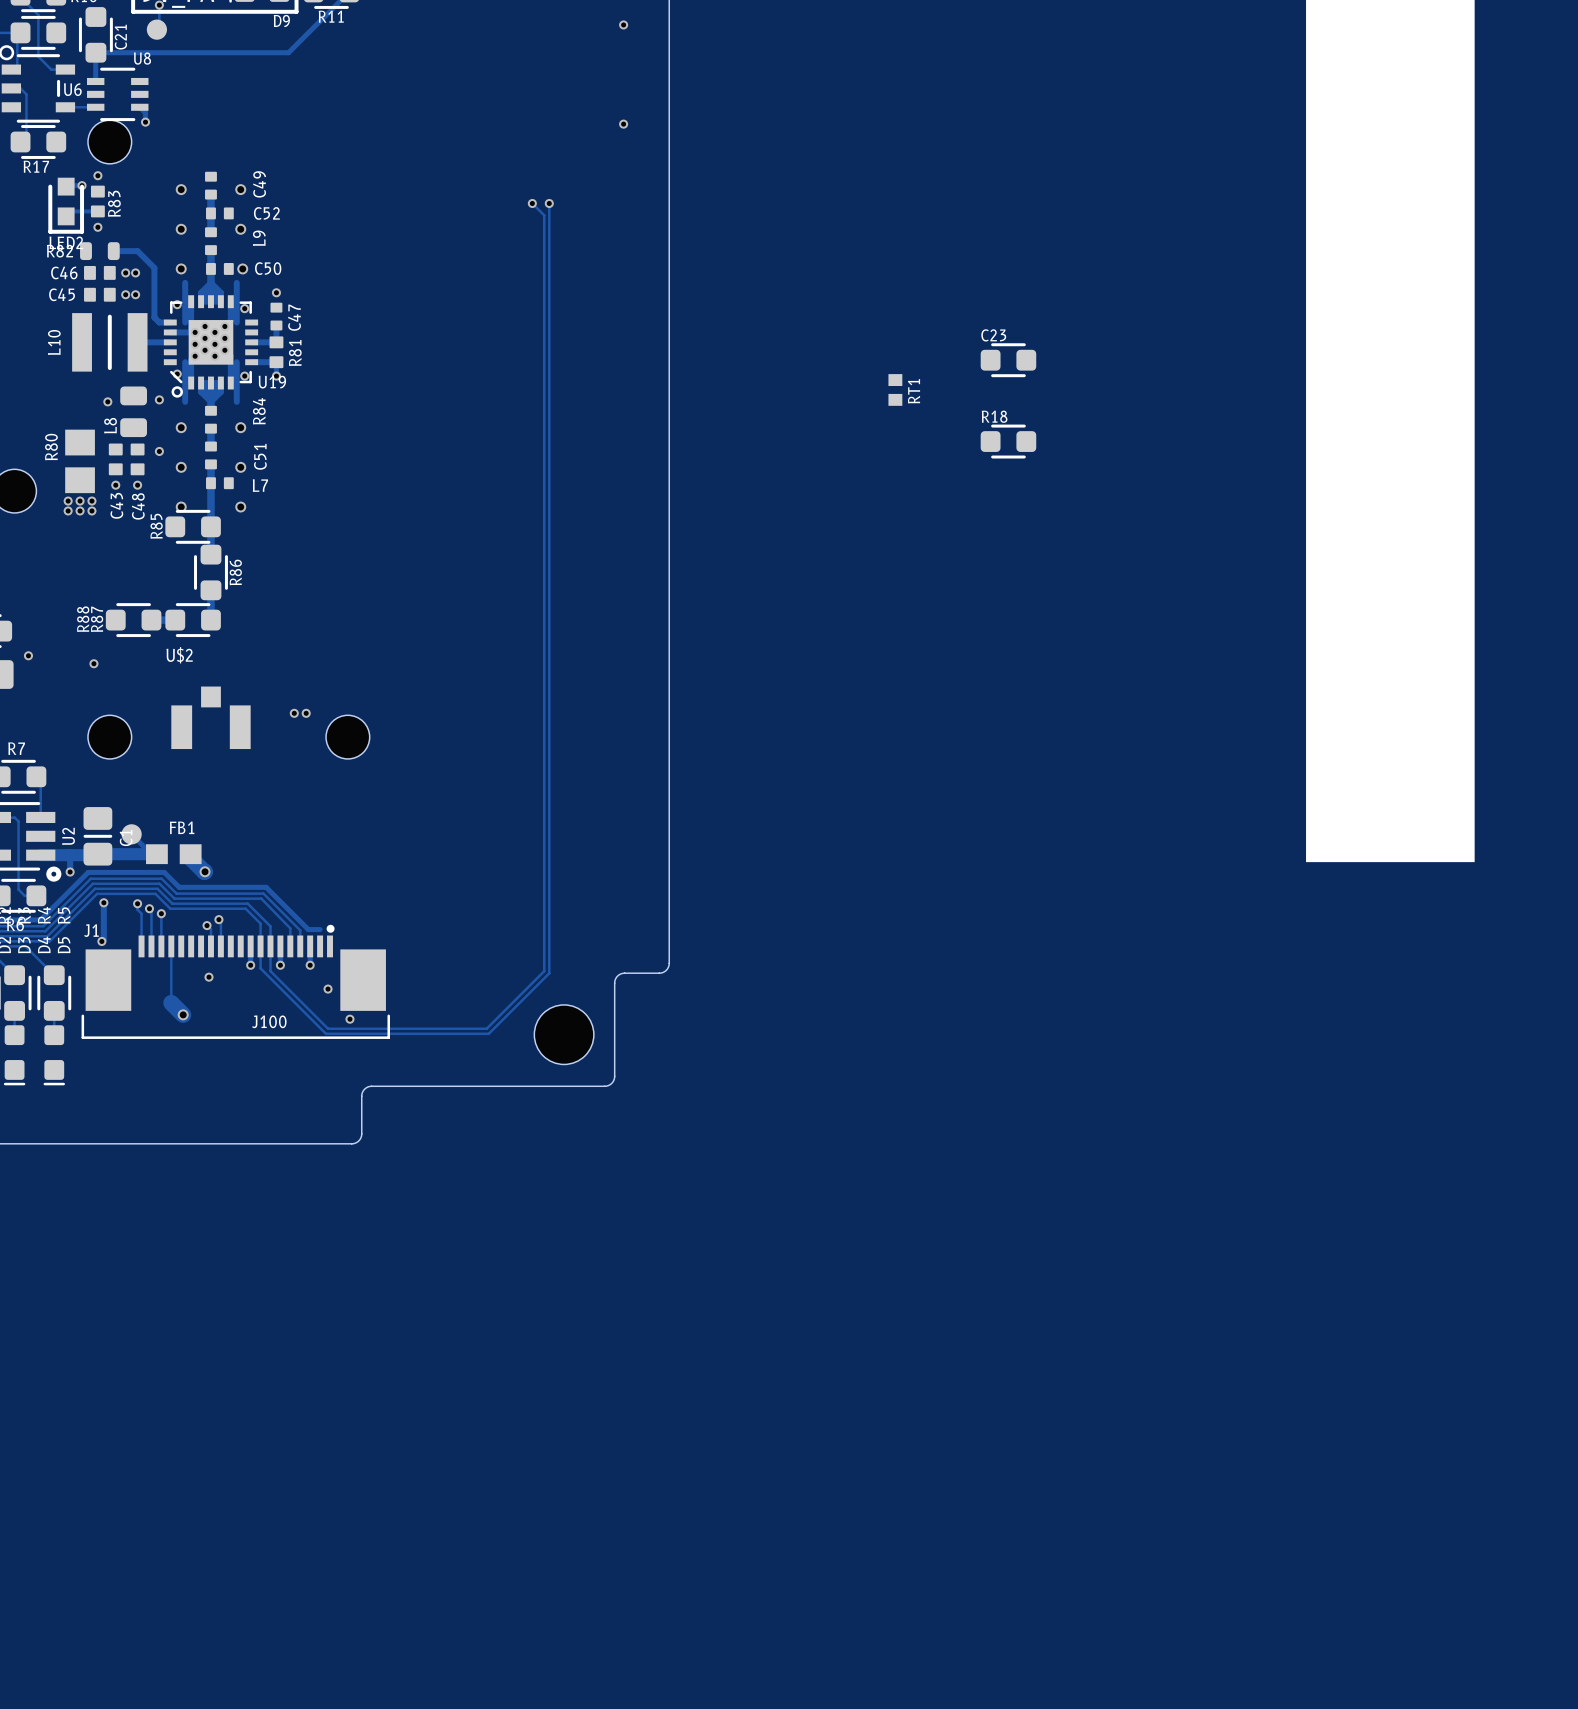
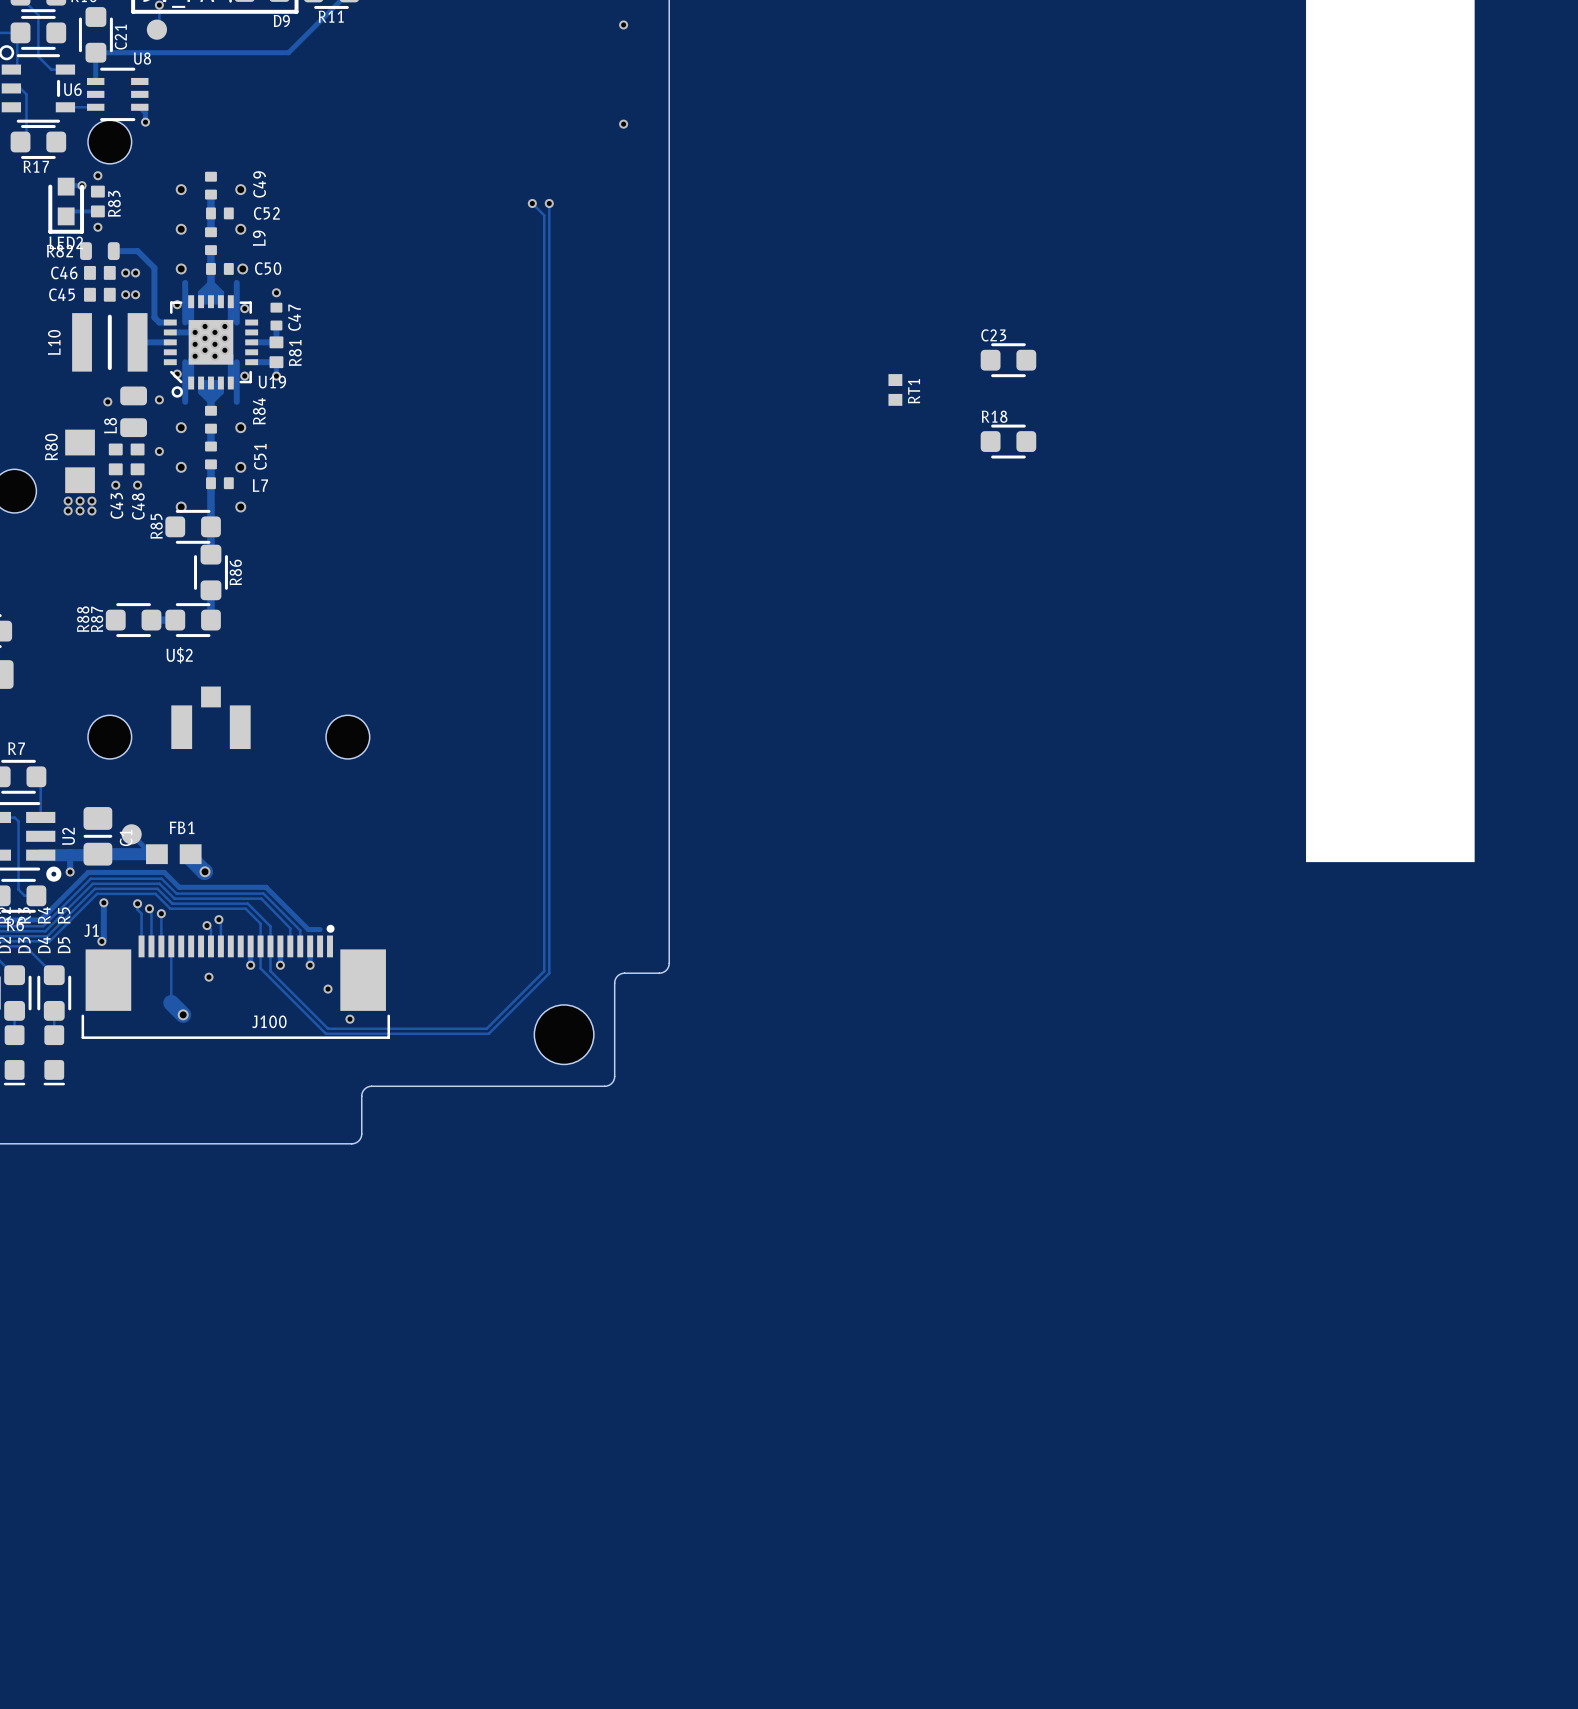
via: (28, 655) -> none
via: (93, 663) -> none
via: (294, 713) -> none
via: (306, 713) -> none

